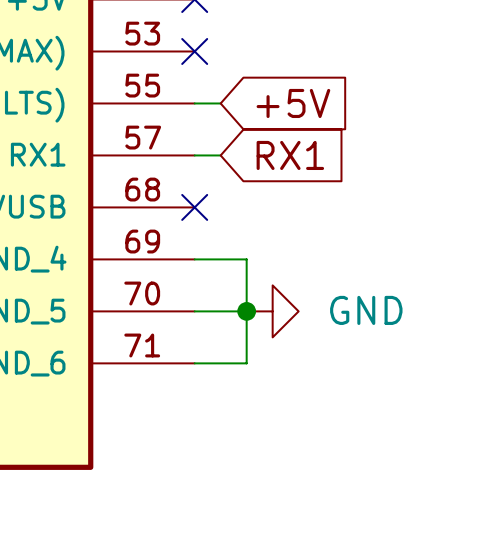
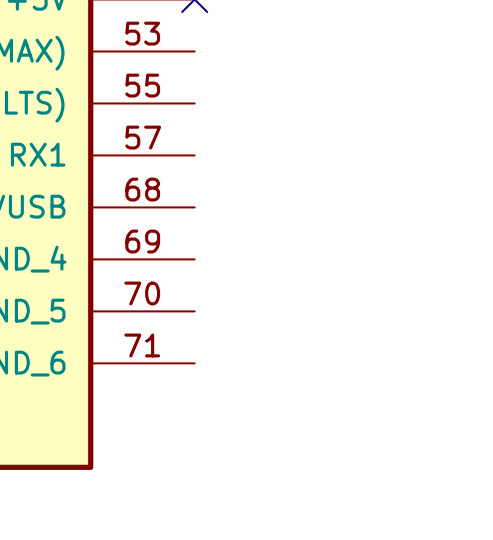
no-connect mark: (194, 51) -> none
wire: (194, 103) (220, 103) -> none
global label: +5V (293, 103) -> none
wire: (194, 155) (220, 155) -> none
global label: RX1 (290, 155) -> none
no-connect mark: (194, 207) -> none
wire: (194, 259) (246, 259) (246, 363) (194, 363) -> none
wire: (194, 311) (246, 311) -> none
junction: (246, 311) -> none
power symbol: GND (272, 311) -> none

